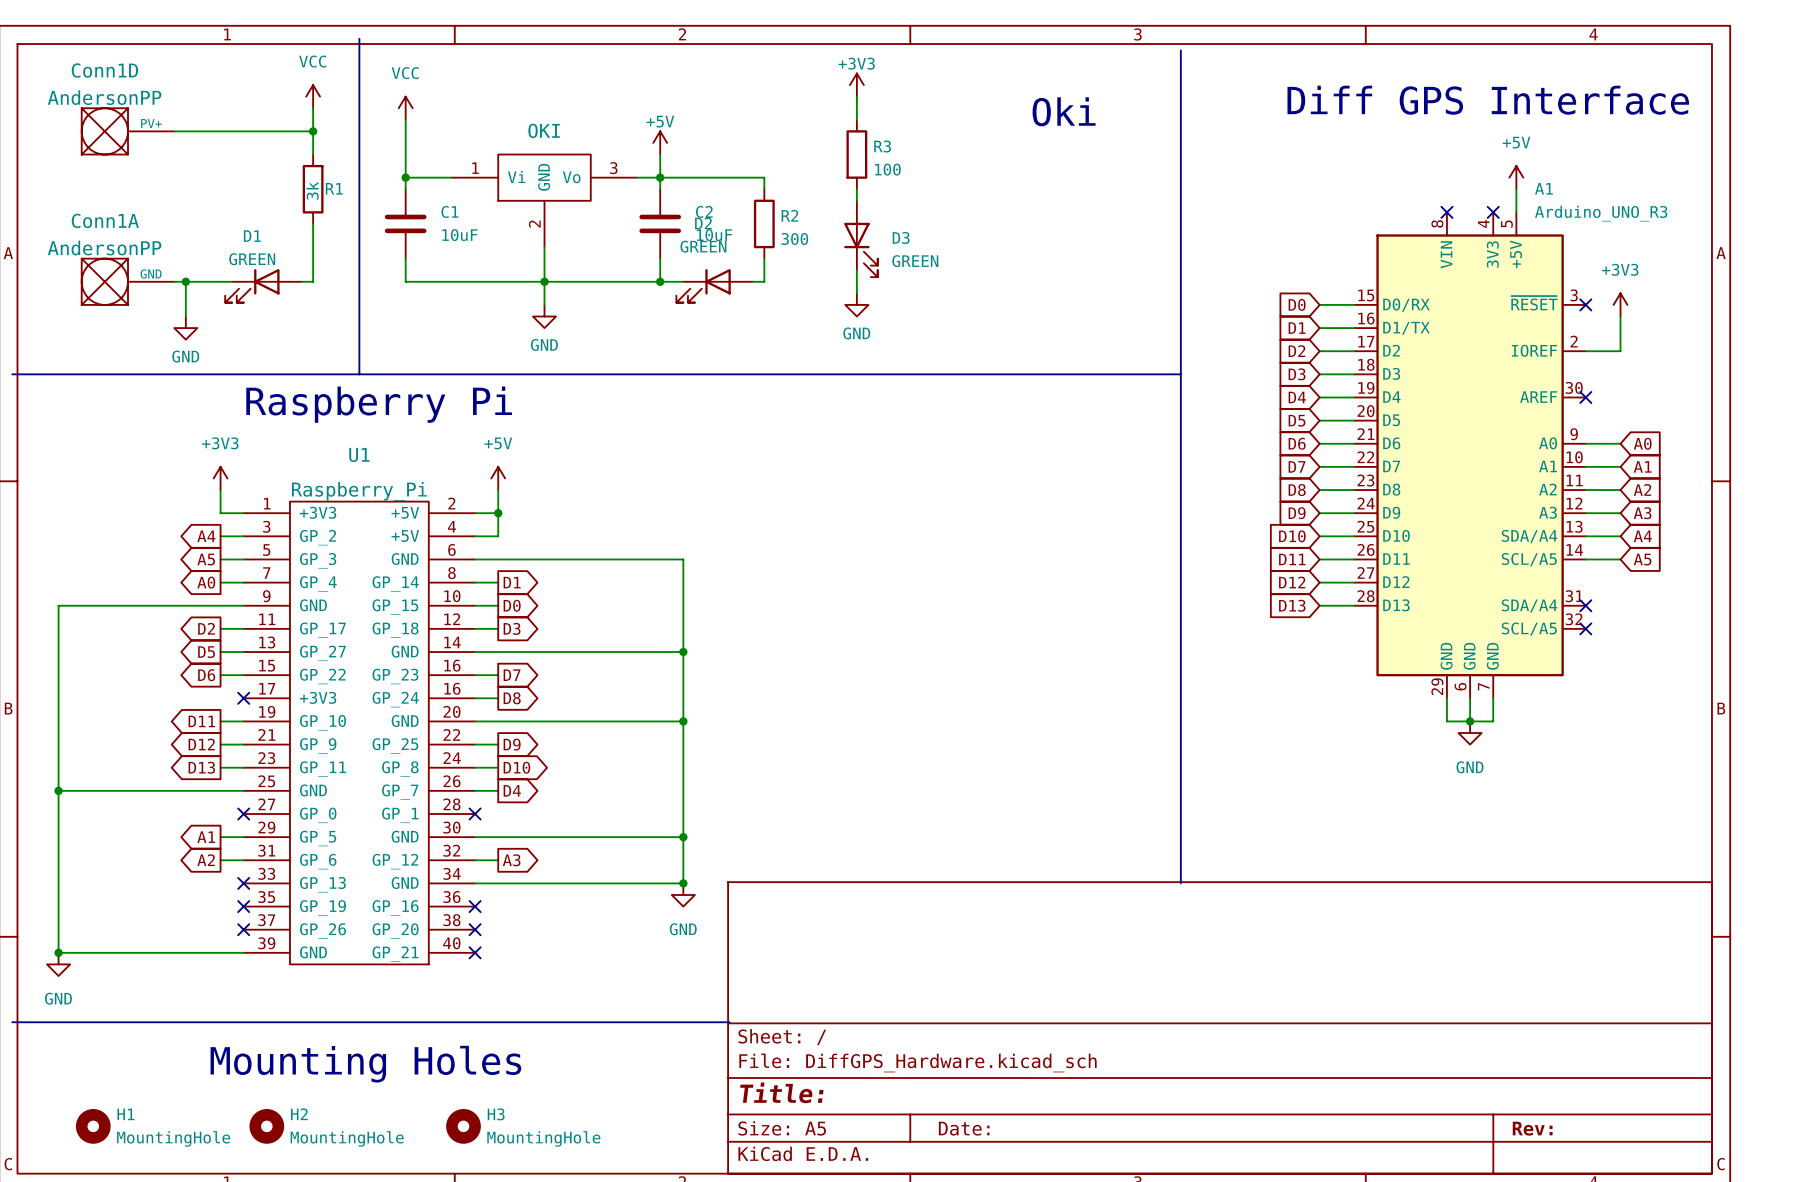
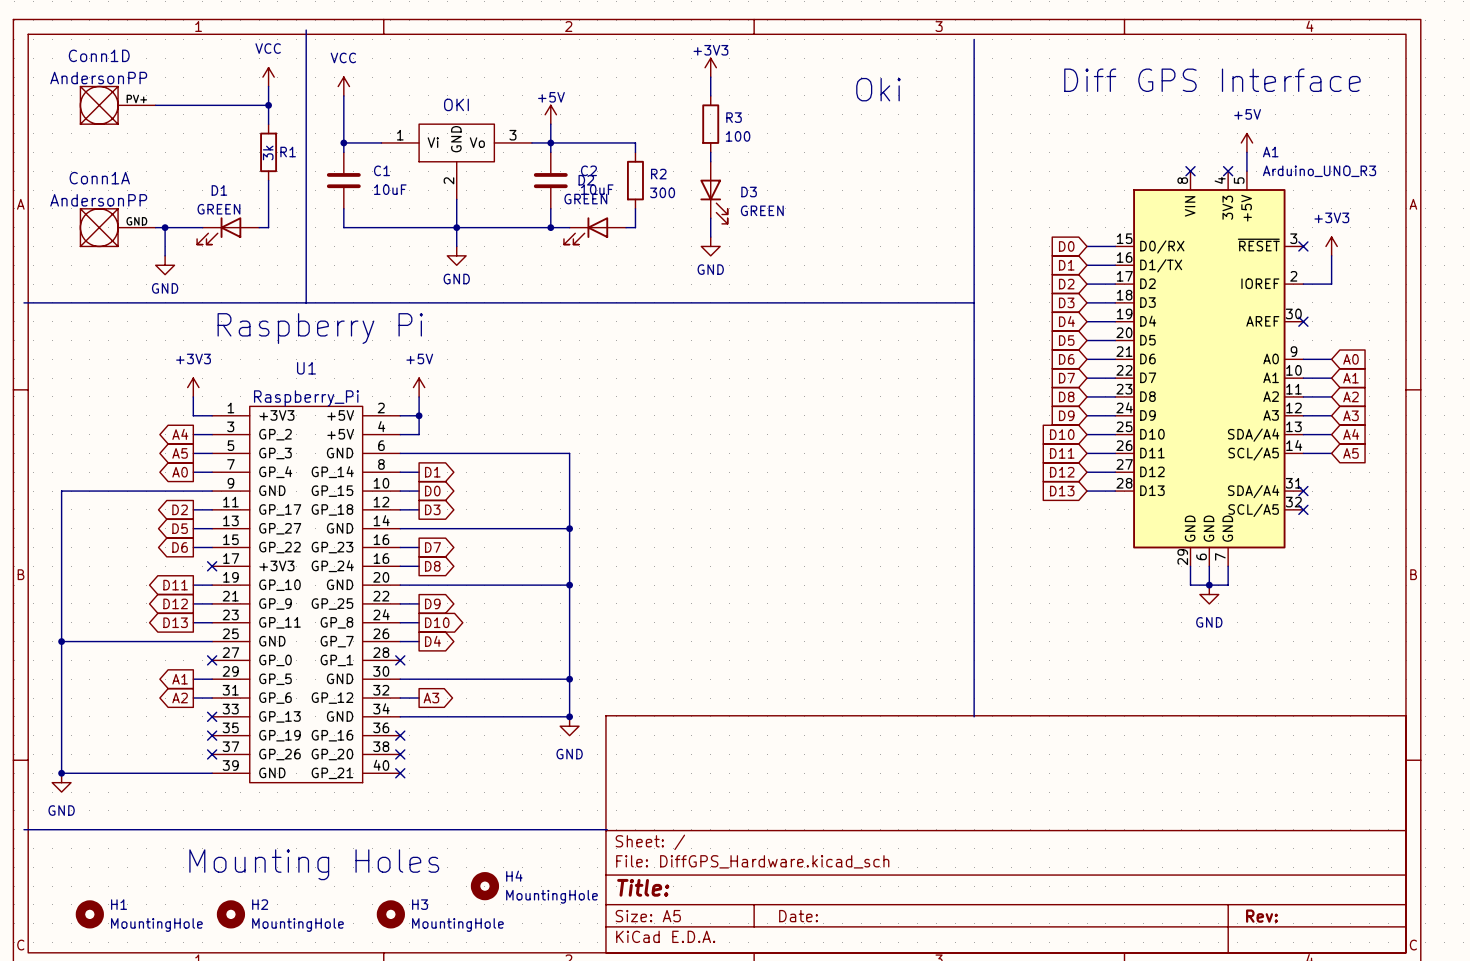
H4: none -> MountingHole (484, 886)

